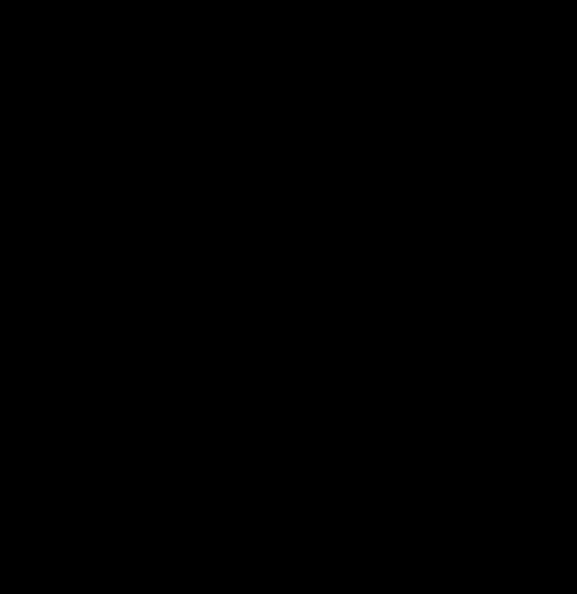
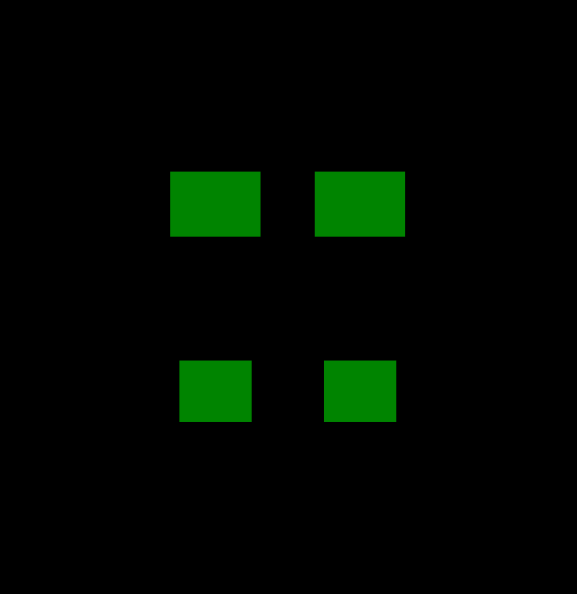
part: none -> (287, 204)
part: none -> (287, 391)

